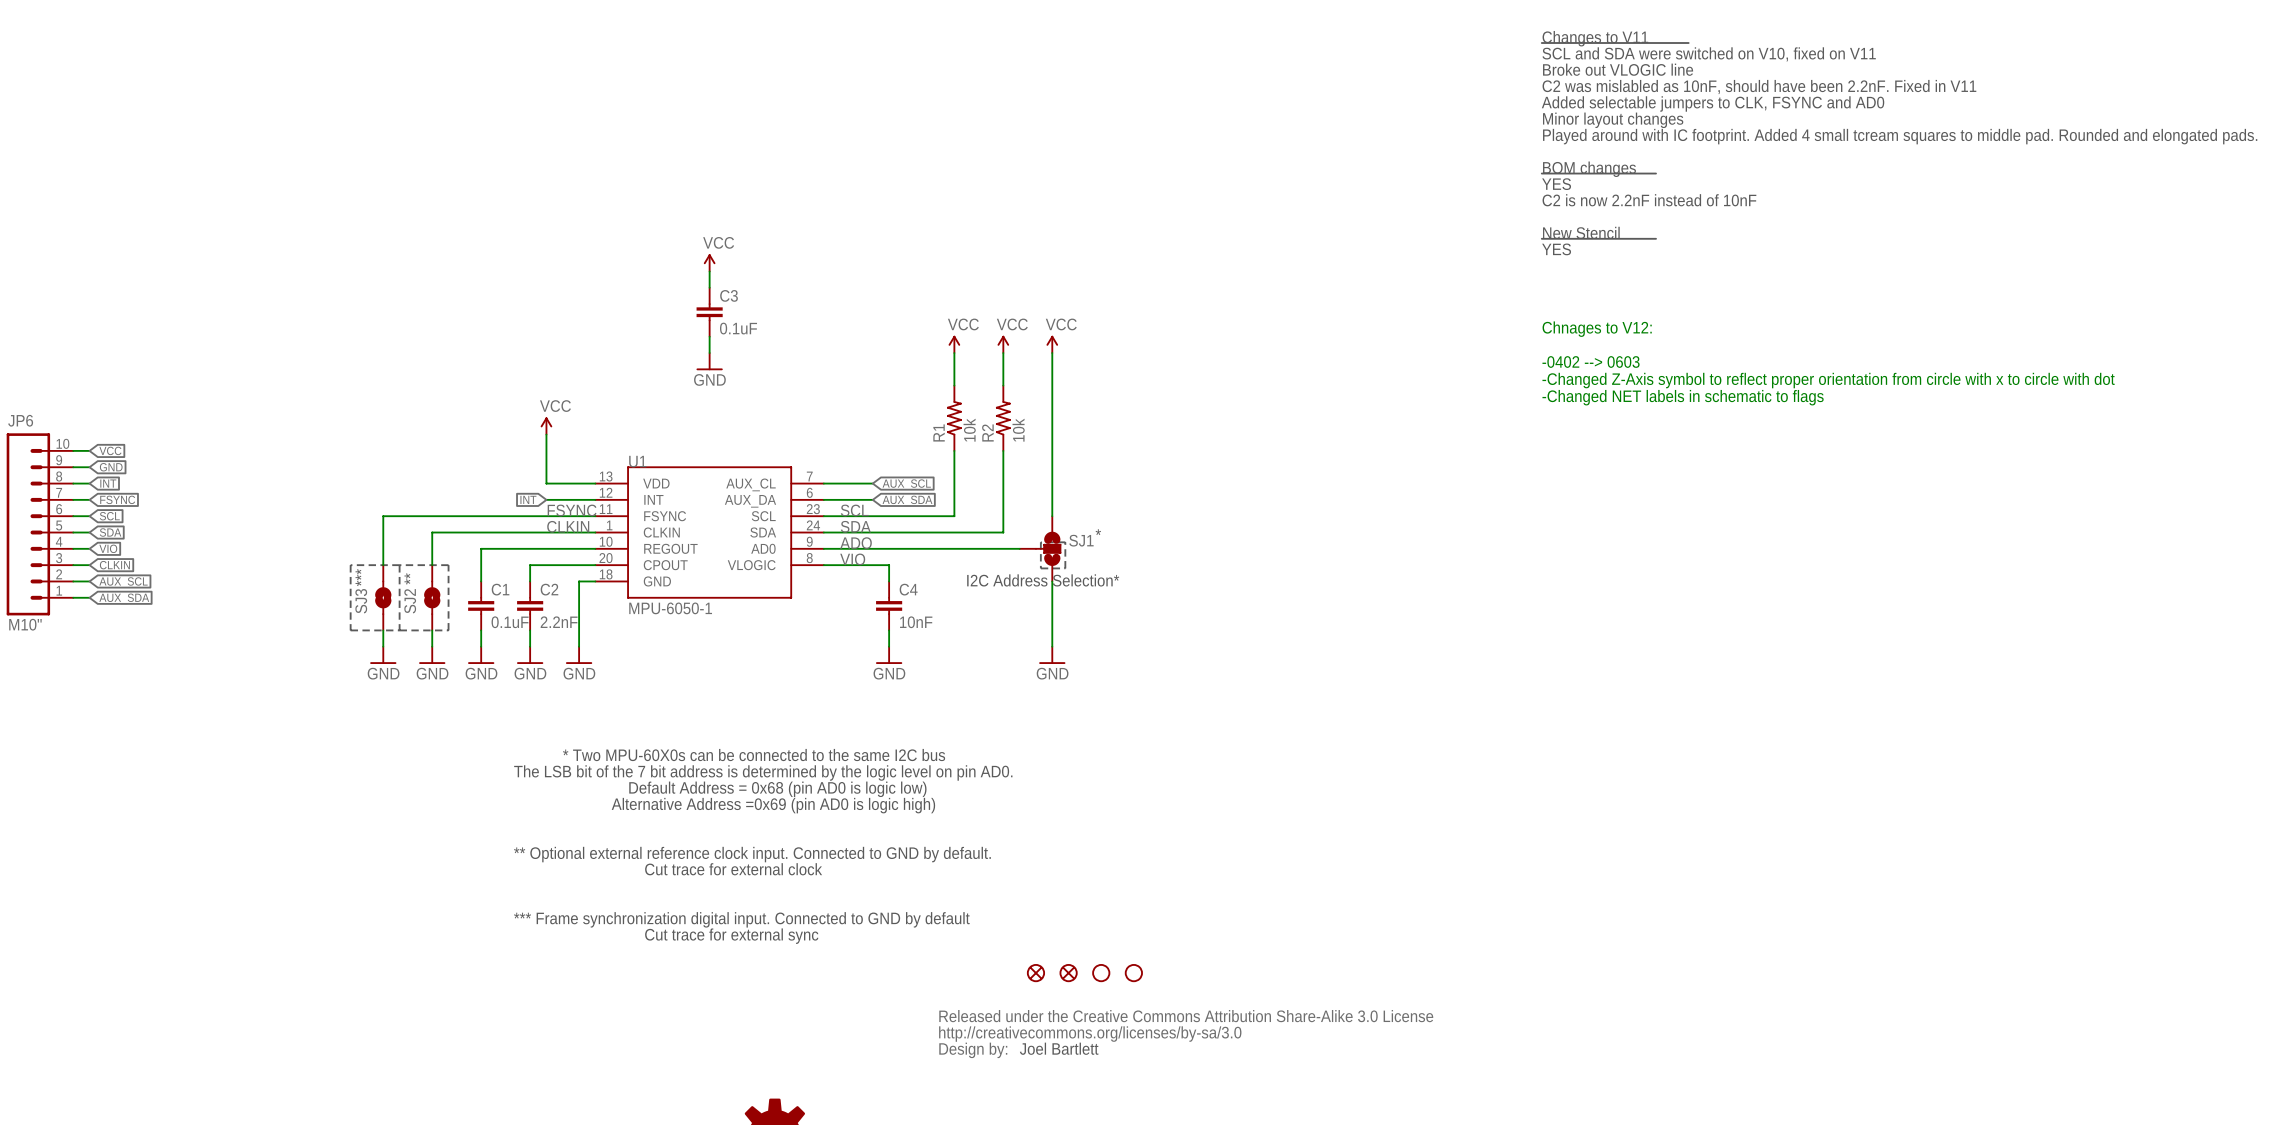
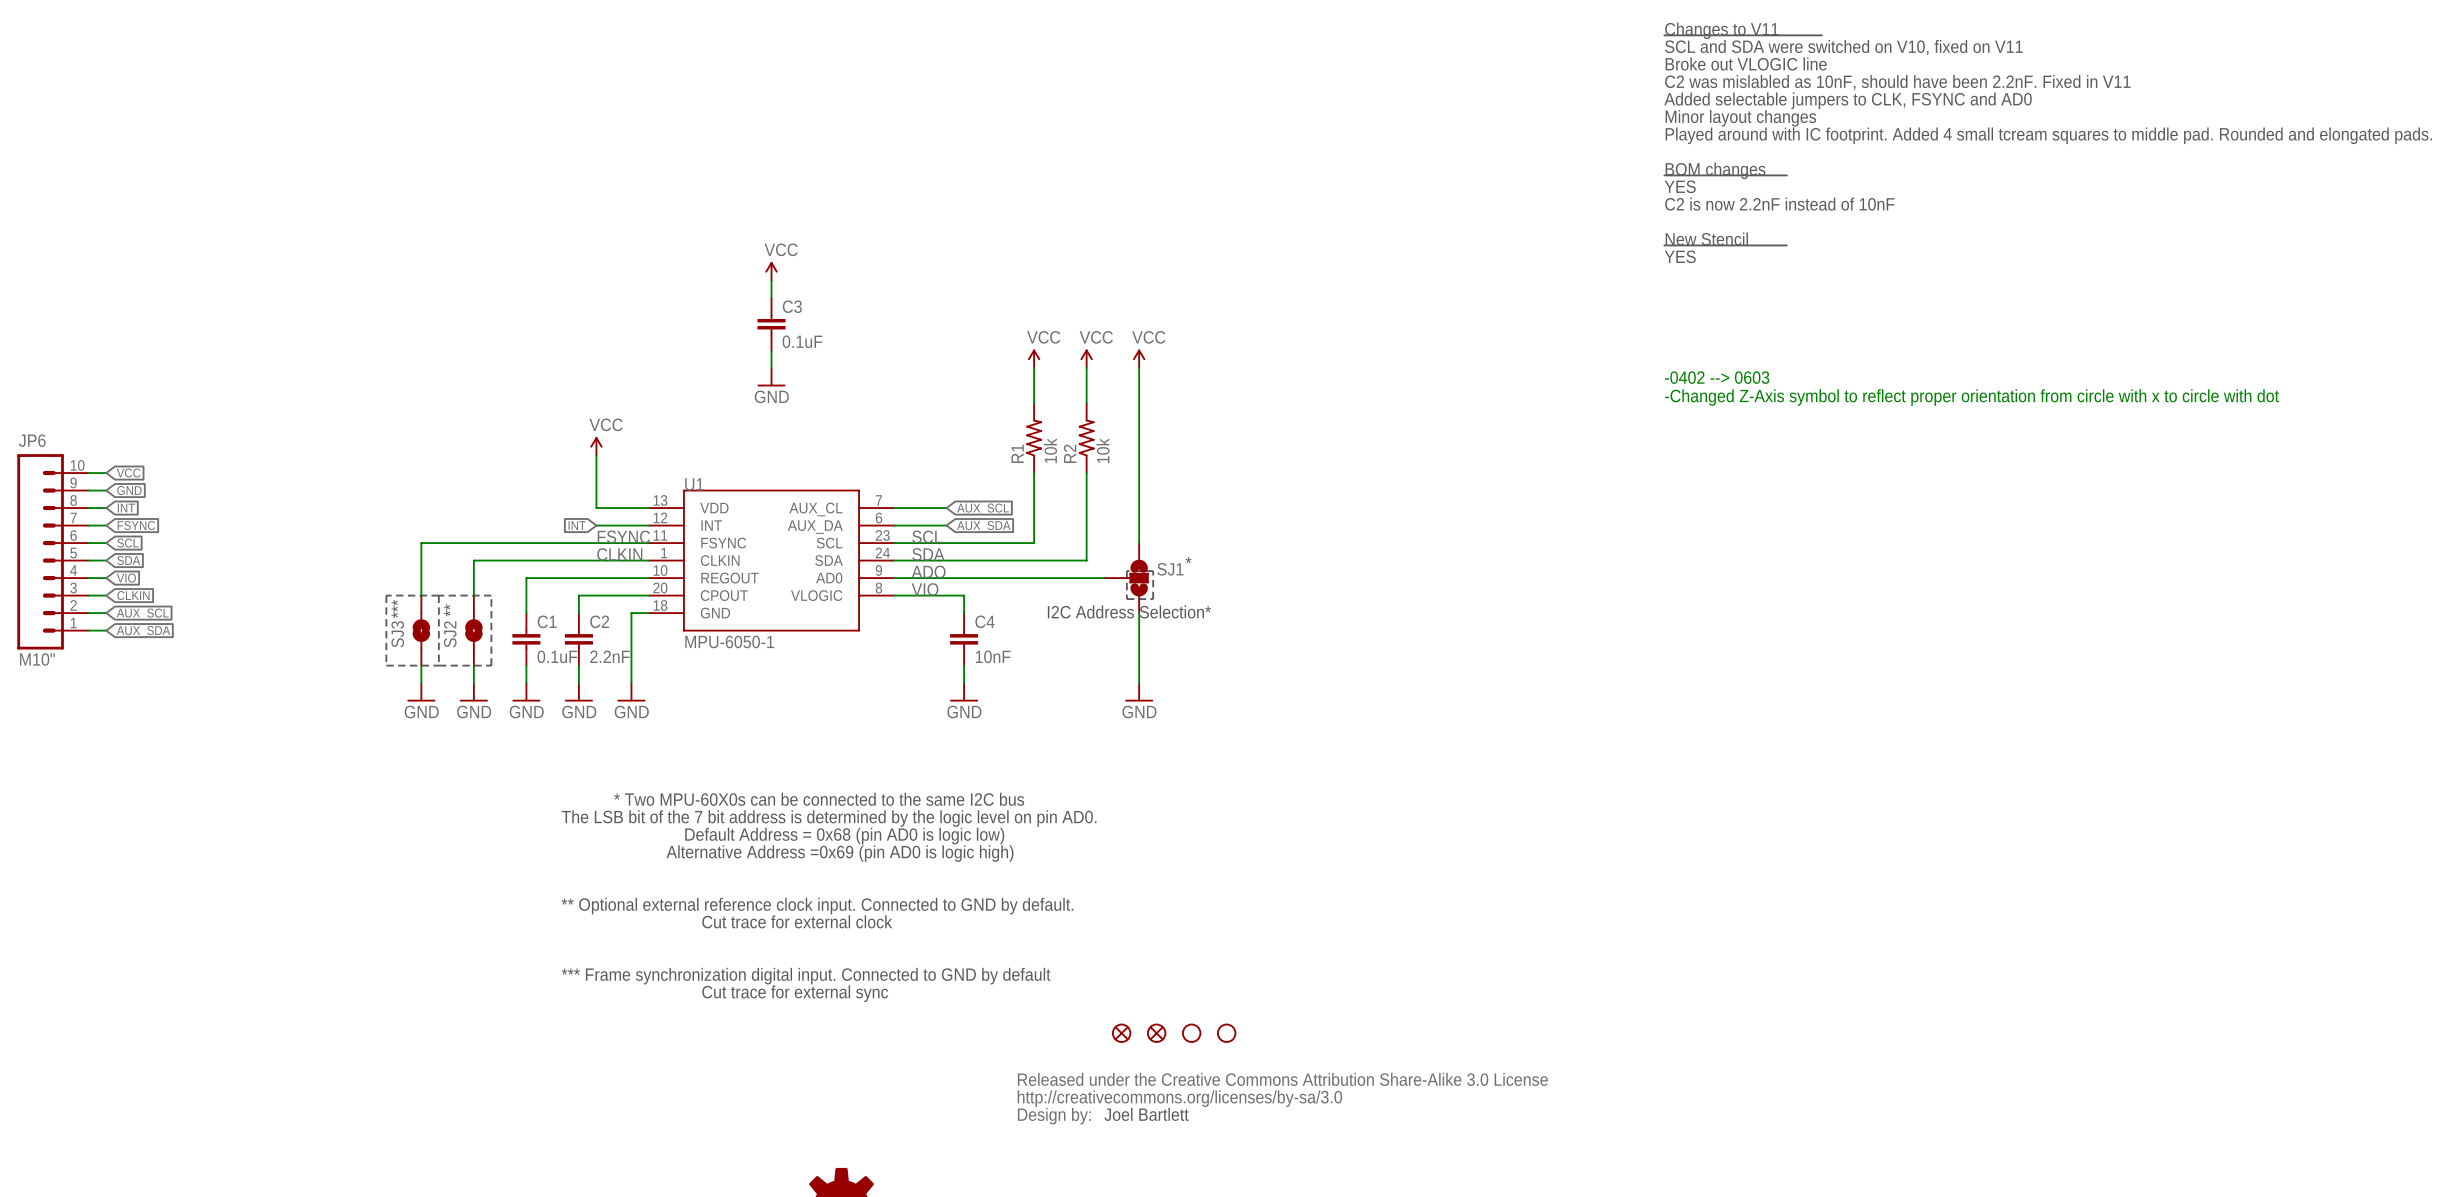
text: Chnages to V12: (1597, 329) -> none
text: -Changed NET labels in schematic to flags (1683, 397) -> none

